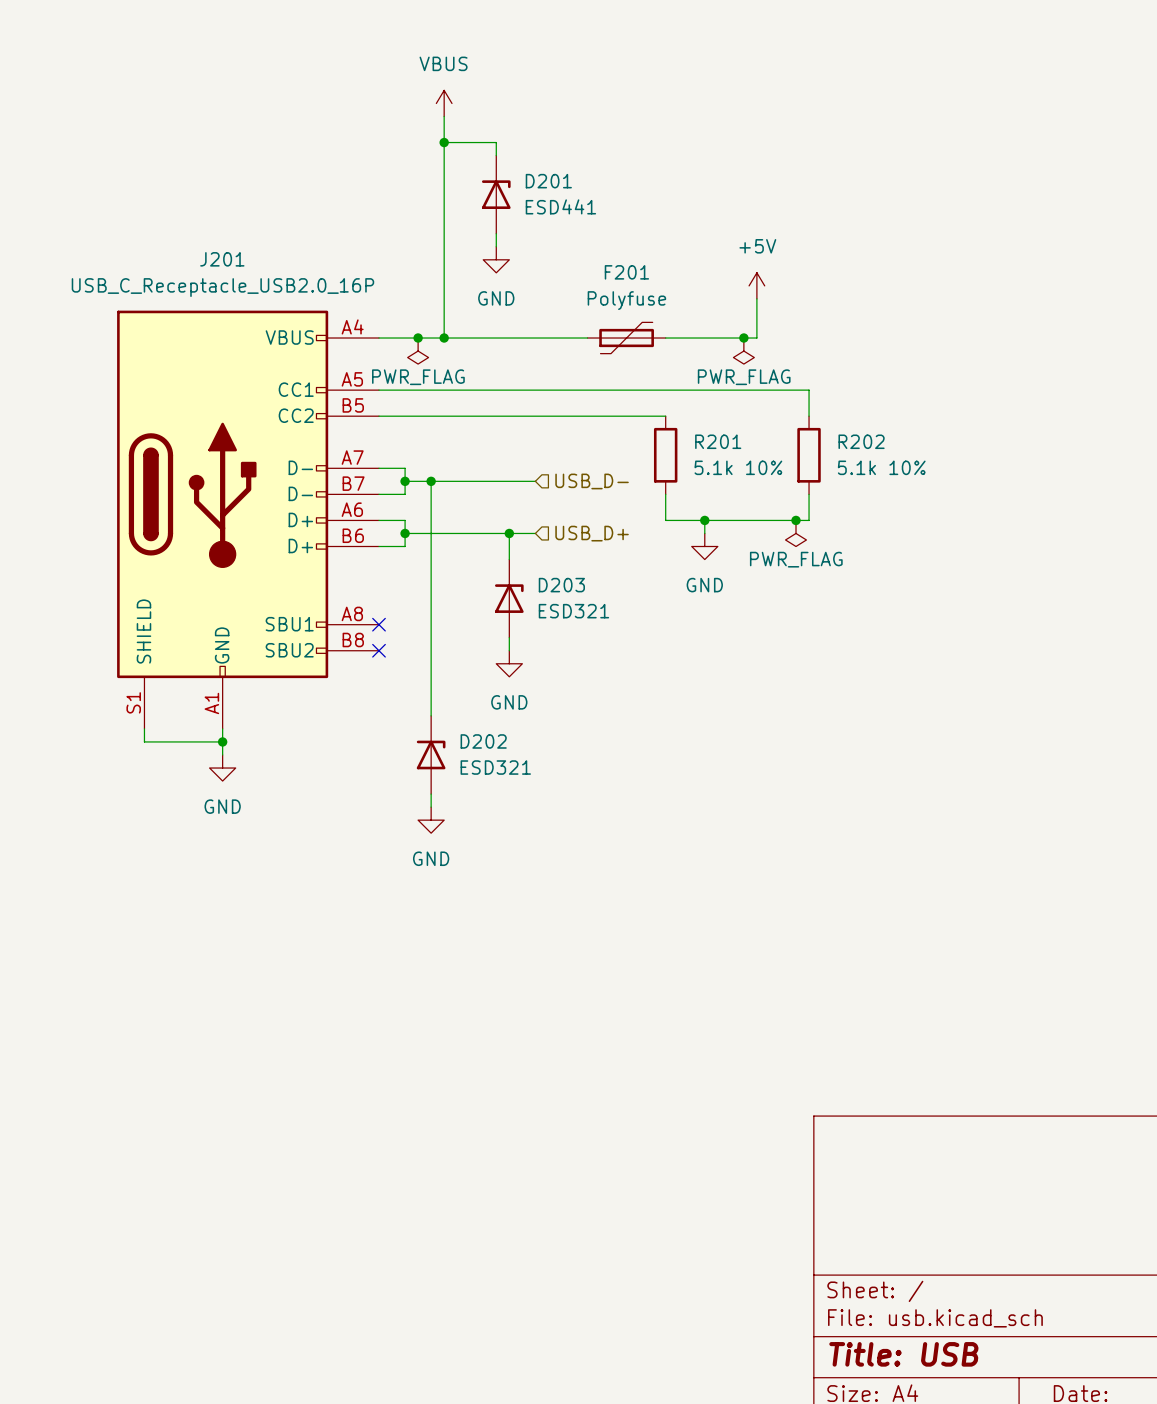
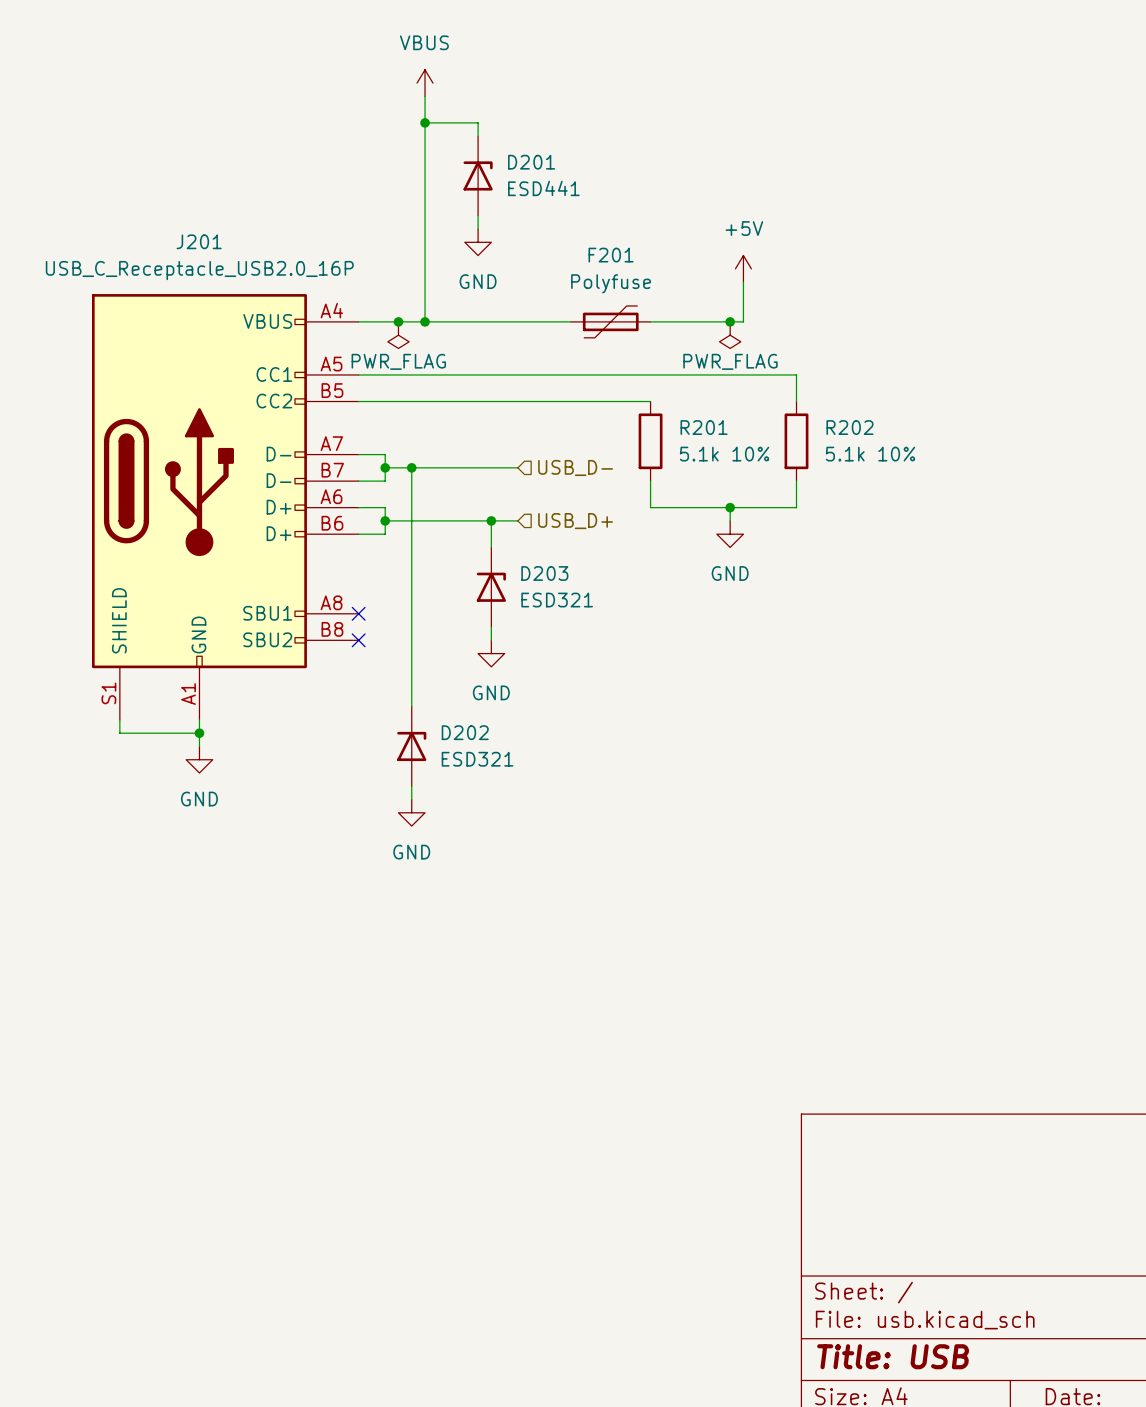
wire: (704, 520) (704, 533) -> (730, 507) (730, 520)
junction: (704, 520) -> none
junction: none -> (730, 507)
junction: (796, 520) -> none
power symbol: PWR_FLAG (796, 533) -> none
power symbol position: GND (704, 546) -> GND (730, 534)

